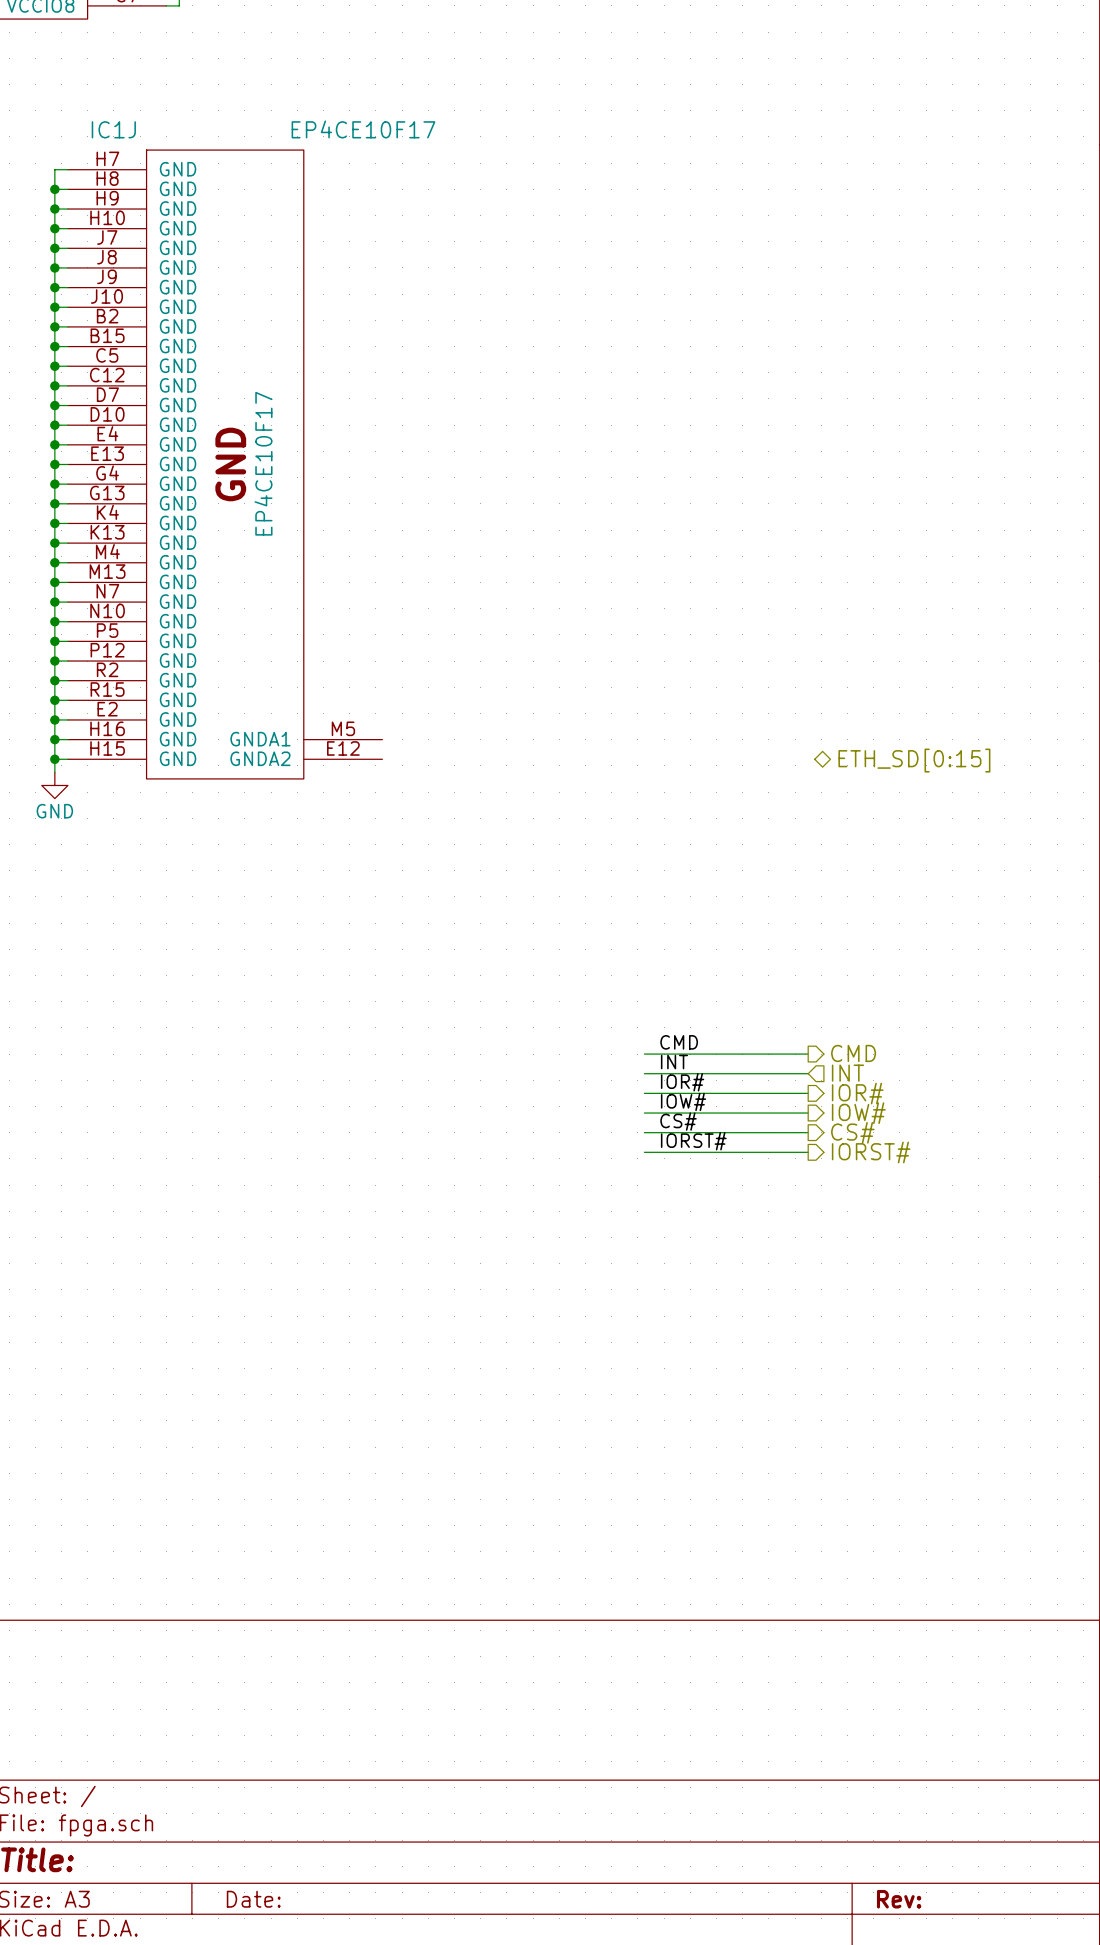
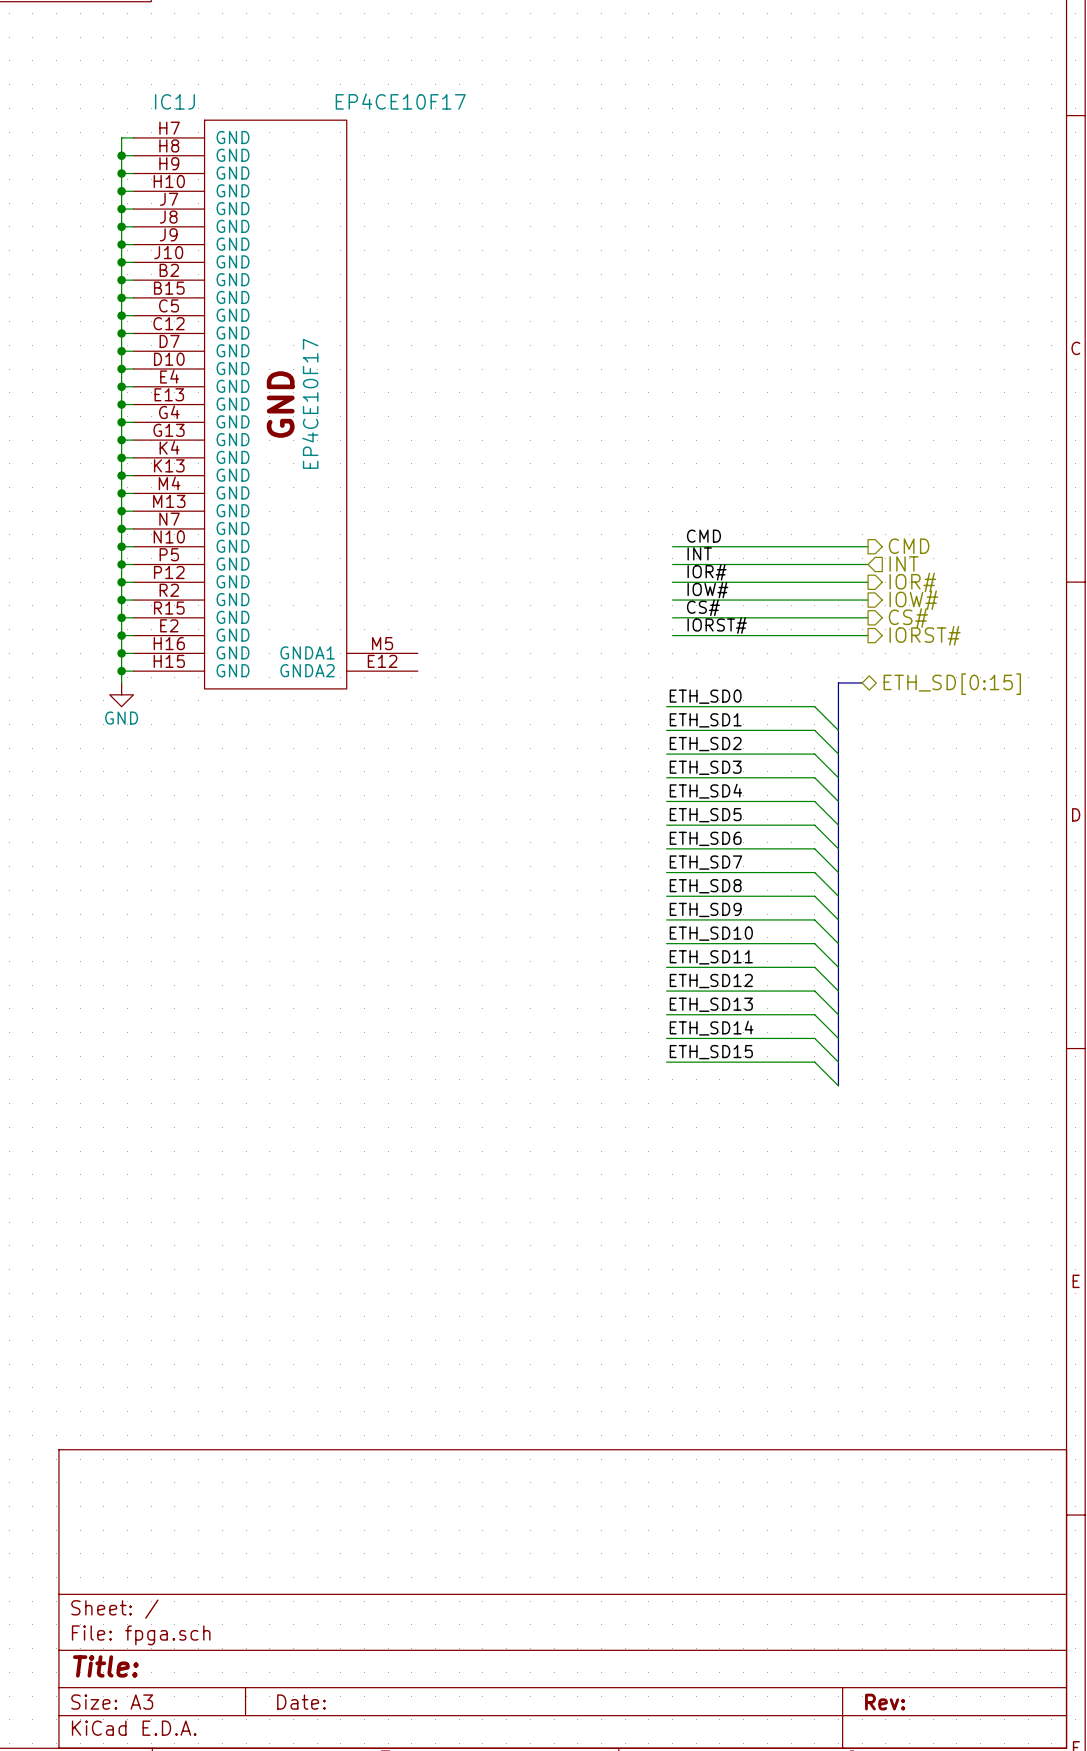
label: none -> CMD (703, 536)
wire: none -> (672, 546) (868, 546)
hierarchical label: none -> CMD (909, 546)
label: none -> INT (699, 553)
hierarchical label: none -> INT (904, 563)
wire: none -> (672, 564) (868, 564)
label: none -> IOR# (707, 572)
wire: none -> (672, 582) (868, 582)
hierarchical label: none -> IOR# (912, 582)
label: none -> IOW# (707, 590)
wire: none -> (672, 600) (868, 600)
hierarchical label: none -> IOW# (913, 600)
label: none -> CS# (703, 607)
wire: none -> (672, 617) (868, 617)
hierarchical label: none -> CS# (908, 617)
label: none -> IORST# (717, 625)
wire: none -> (672, 635) (868, 635)
hierarchical label: none -> IORST# (925, 635)
hierarchical label position: ETH_SD[0:15] (914, 760) -> ETH_SD[0:15] (952, 684)
bus: none -> (862, 682) (838, 682) (838, 1085)
label: none -> ETH_SD0 (705, 696)
wire: none -> (666, 706) (814, 706) (838, 730)
label: none -> ETH_SD1 (705, 720)
wire: none -> (666, 730) (814, 730) (838, 754)
label: none -> ETH_SD2 (705, 744)
wire: none -> (666, 754) (814, 754) (838, 777)
label: none -> ETH_SD3 (705, 767)
wire: none -> (666, 777) (814, 777) (838, 801)
label: none -> ETH_SD4 (705, 791)
wire: none -> (666, 801) (814, 801) (838, 825)
label: none -> ETH_SD5 (705, 815)
wire: none -> (666, 825) (814, 825) (838, 848)
label: none -> ETH_SD6 (705, 838)
wire: none -> (666, 848) (814, 848) (838, 872)
label: none -> ETH_SD7 (705, 862)
wire: none -> (666, 872) (814, 872) (838, 896)
label: none -> ETH_SD8 (705, 886)
wire: none -> (666, 896) (814, 896) (838, 919)
label: none -> ETH_SD9 (705, 909)
wire: none -> (666, 919) (814, 919) (838, 943)
label: CMD (679, 1042) -> none
label: none -> ETH_SD10 (711, 933)
hierarchical label: CMD (853, 1053) -> none
wire: (644, 1054) (808, 1054) -> none
wire: none -> (666, 943) (814, 943) (838, 967)
label: INT (674, 1062) -> none
wire: (644, 1073) (808, 1073) -> none
hierarchical label: INT (847, 1073) -> none
label: none -> ETH_SD11 (711, 957)
label: IOR# (682, 1082) -> none
wire: none -> (666, 967) (814, 967) (838, 991)
wire: (644, 1093) (808, 1093) -> none
hierarchical label: IOR# (857, 1093) -> none
label: IOW# (683, 1101) -> ETH_SD12 (711, 981)
wire: (644, 1113) (657, 1113) -> none
wire: none -> (802, 991) (814, 991) (838, 1014)
hierarchical label: IOW# (858, 1113) -> none
label: CS# (678, 1121) -> none
label: none -> ETH_SD13 (711, 1004)
wire: (644, 1132) (808, 1132) -> none
hierarchical label: CS# (852, 1132) -> none
wire: none -> (666, 1014) (814, 1014) (838, 1038)
label: IORST# (693, 1141) -> none
wire: (644, 1152) (808, 1152) -> none
hierarchical label: IORST# (871, 1152) -> none
label: none -> ETH_SD14 (711, 1028)
wire: none -> (666, 1038) (814, 1038) (838, 1062)
label: none -> ETH_SD15 (711, 1052)
wire: none -> (666, 1062) (814, 1062) (838, 1085)

